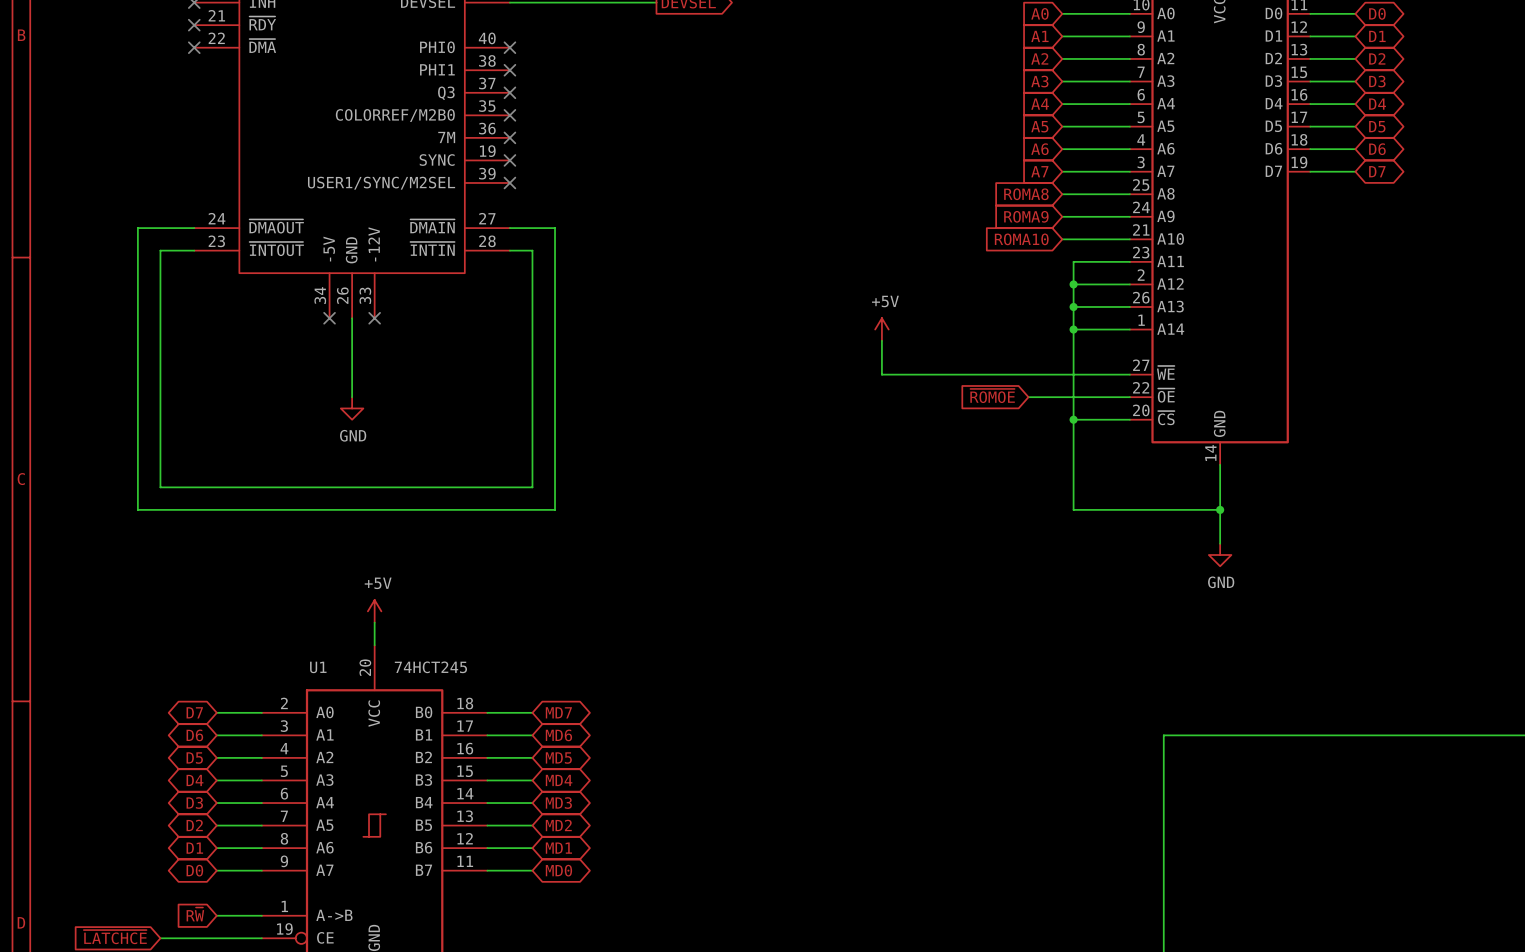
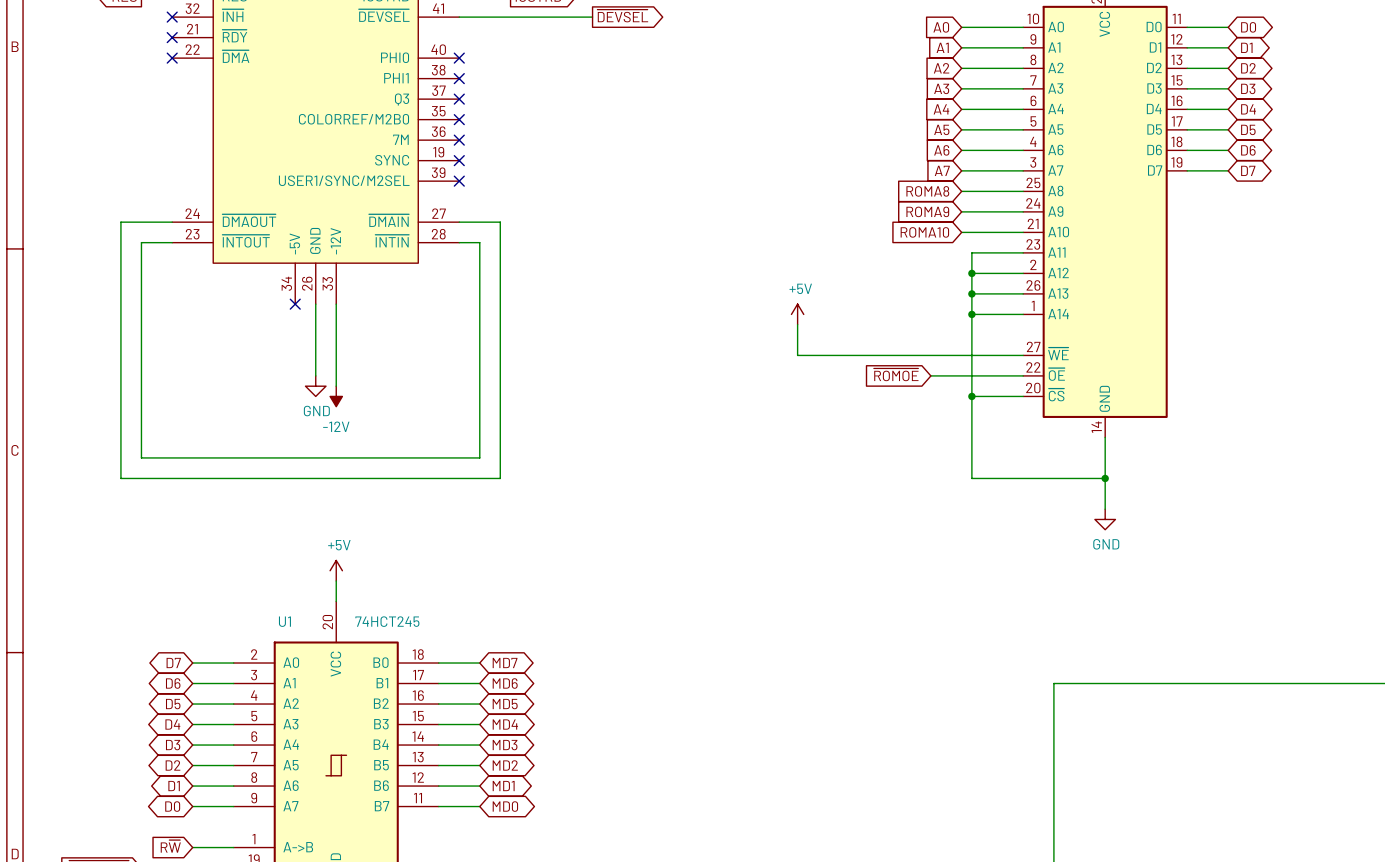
wire: none -> (336, 304) (336, 386)
no-connect mark: (374, 318) -> none
power symbol: none -> -12V (336, 396)

